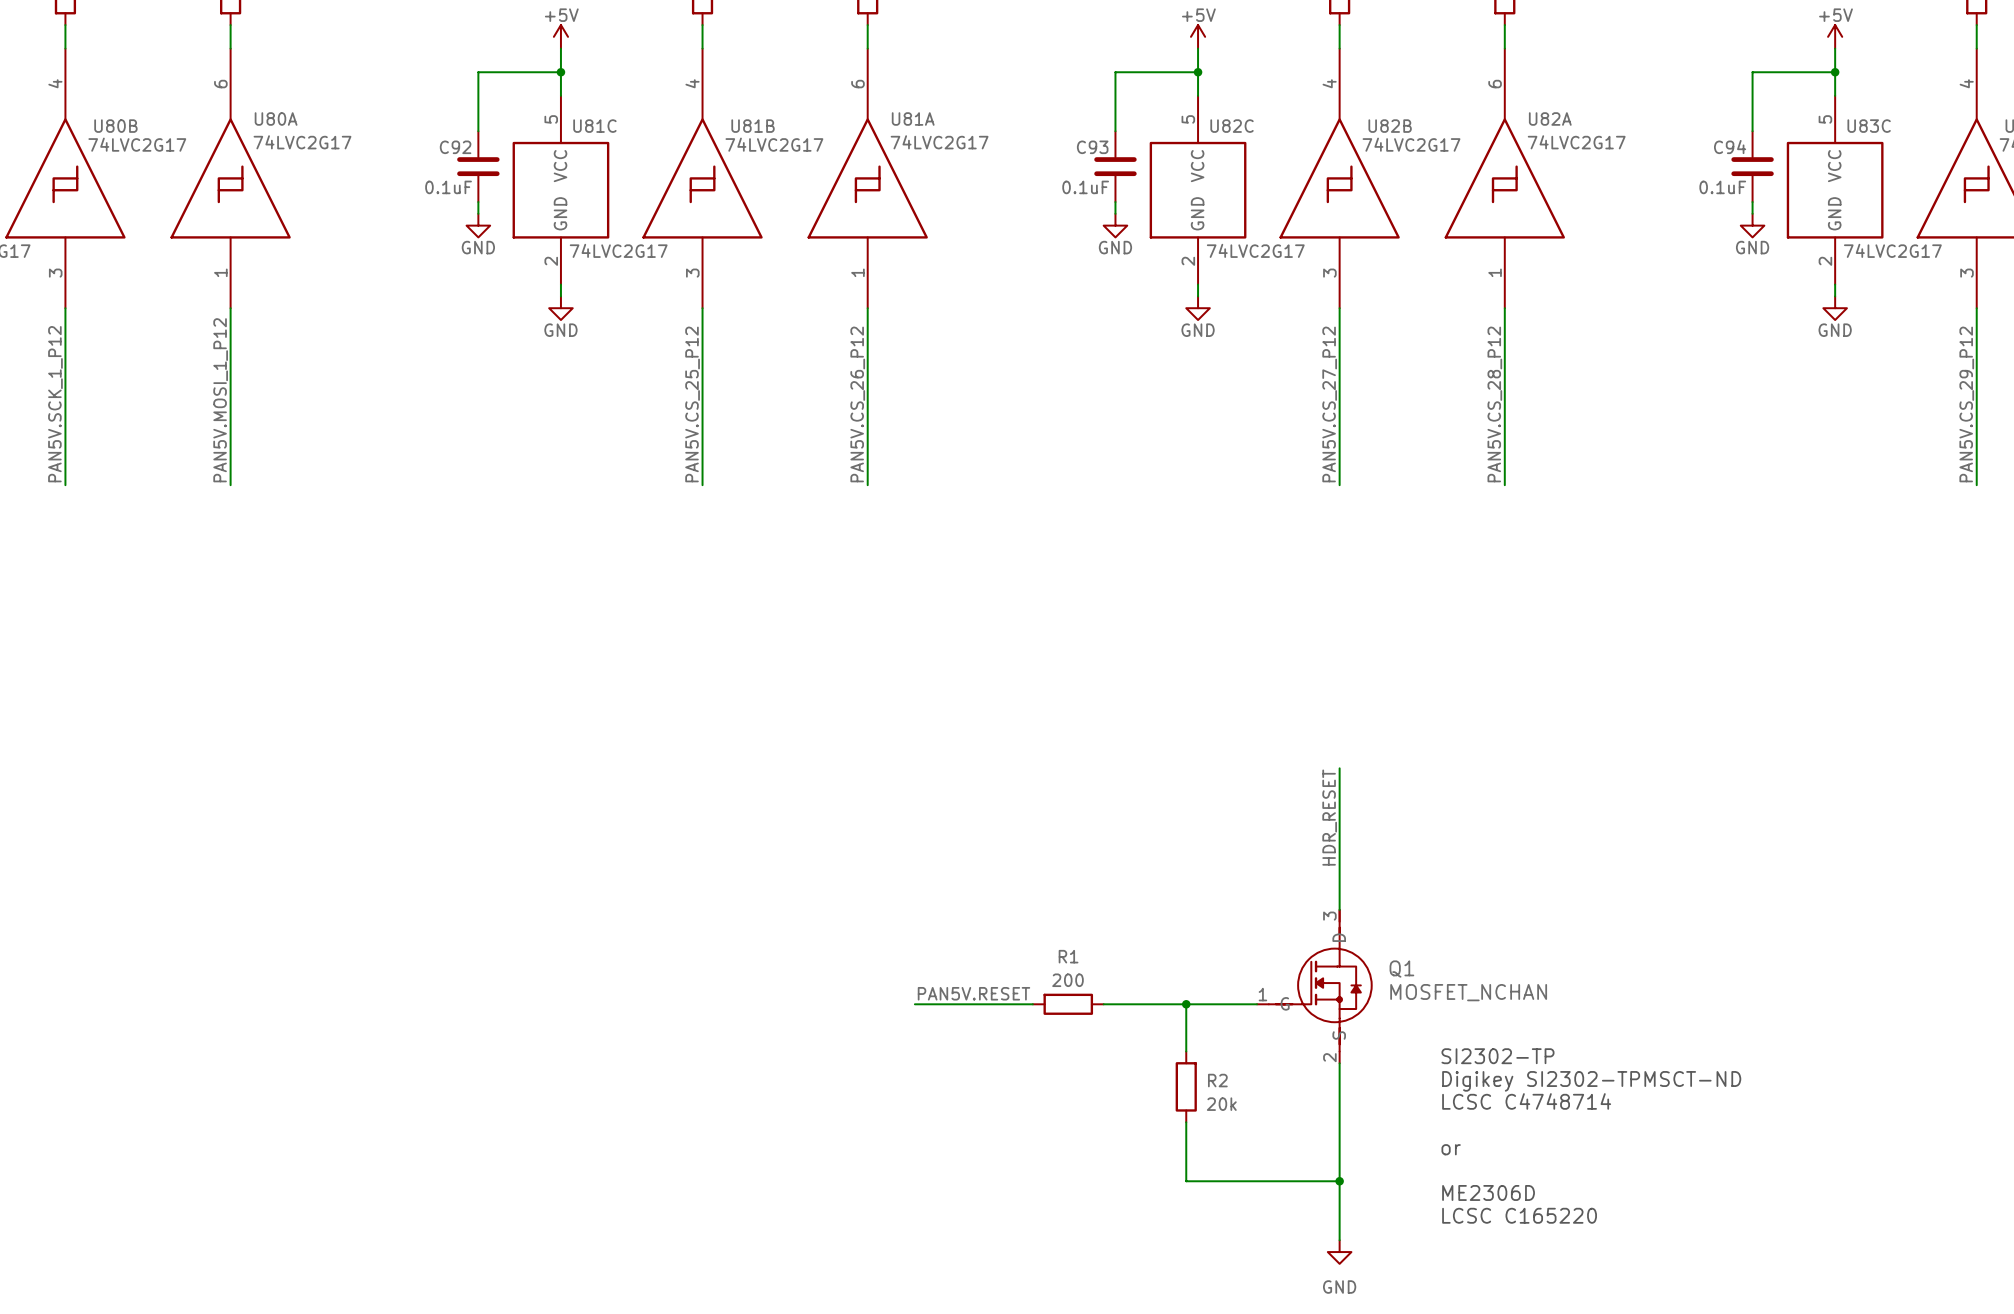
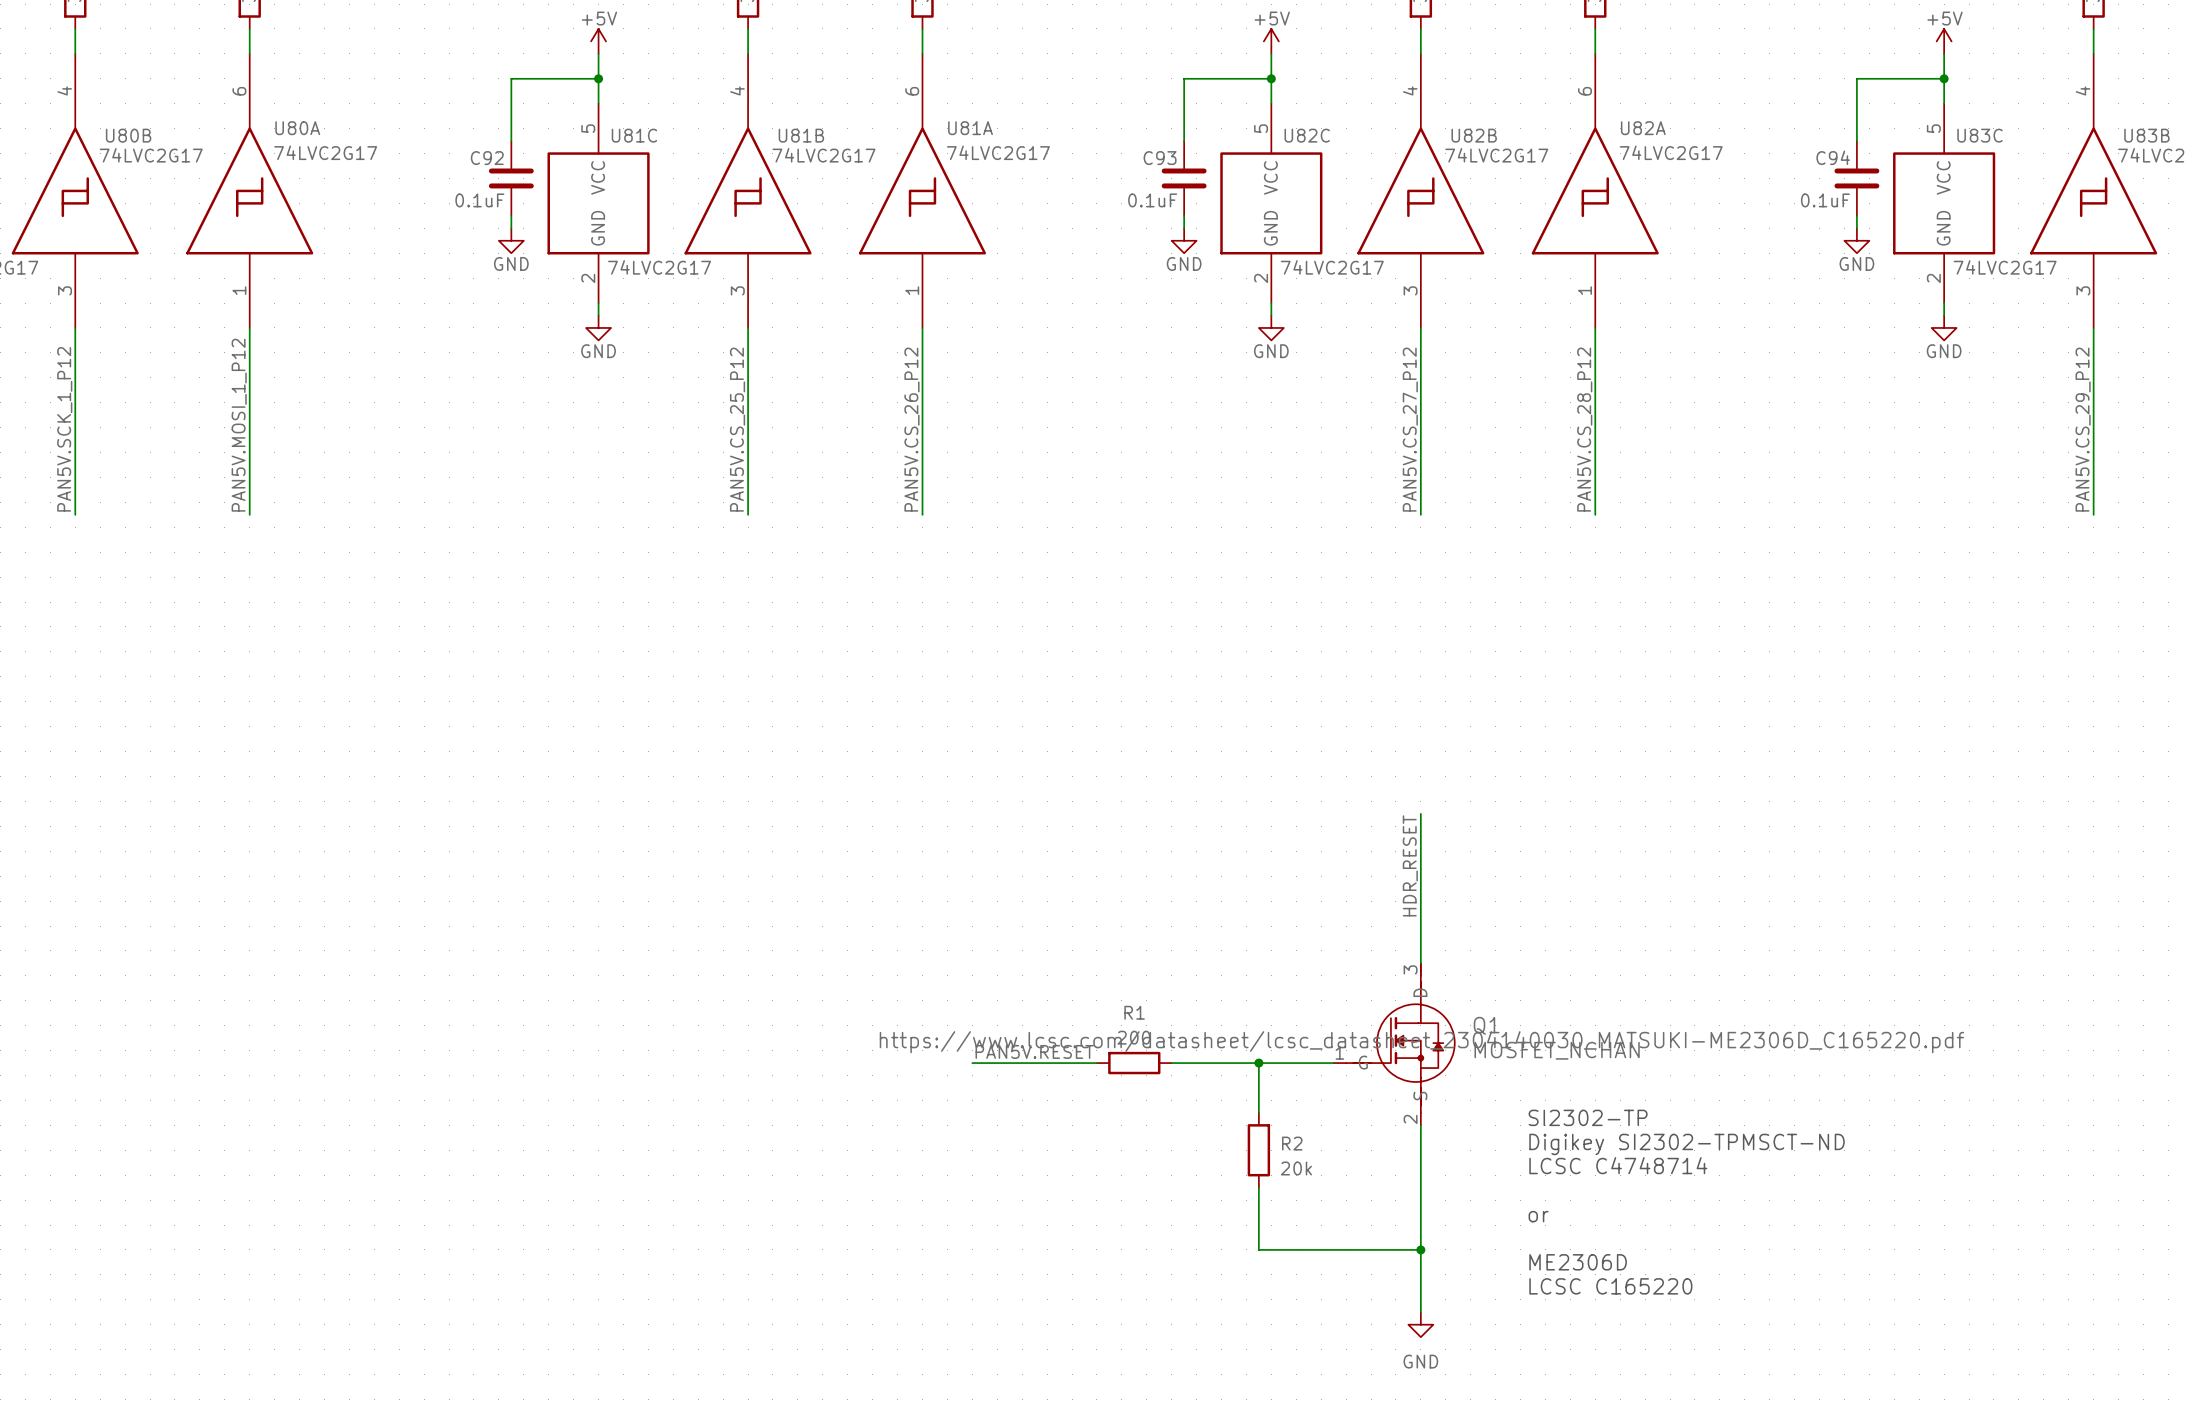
Q1 text: none -> https://www.lcsc.com/datasheet/lcsc_datasheet_2304140030_MATSUKI-ME2306D_C165220.pdf (1421, 1042)

